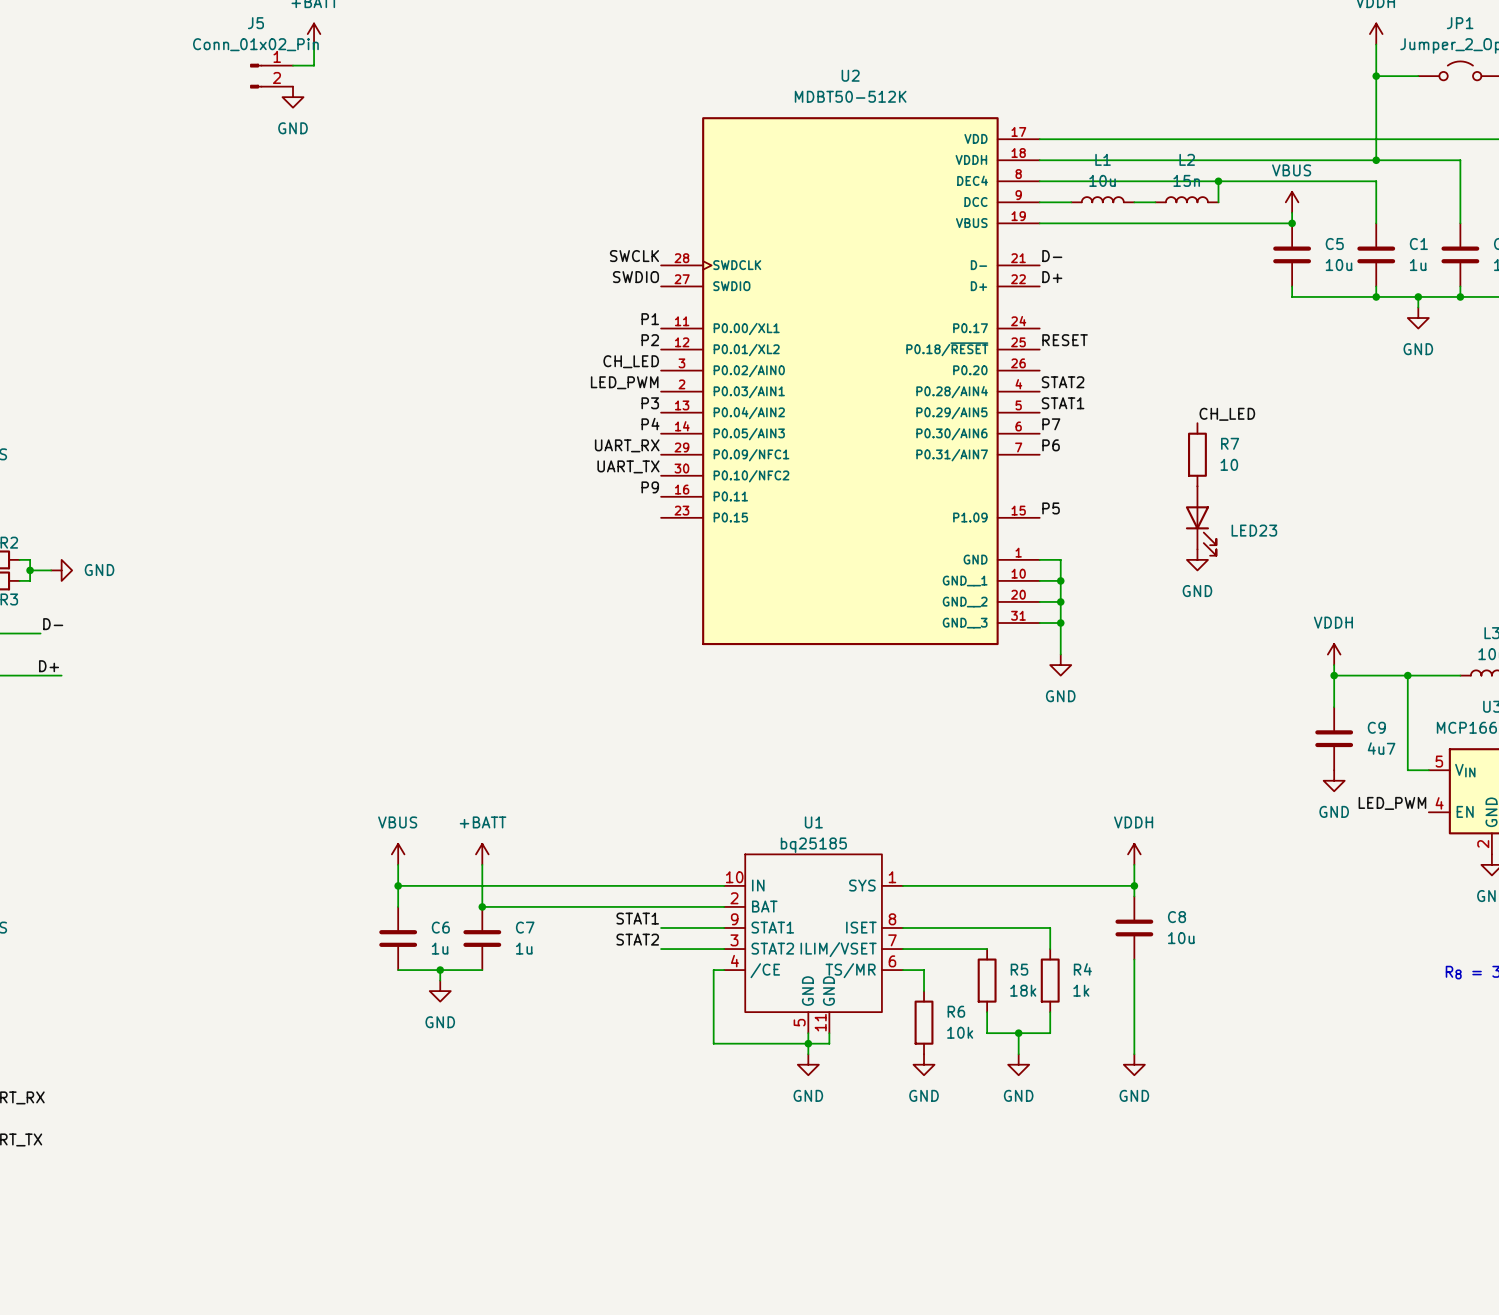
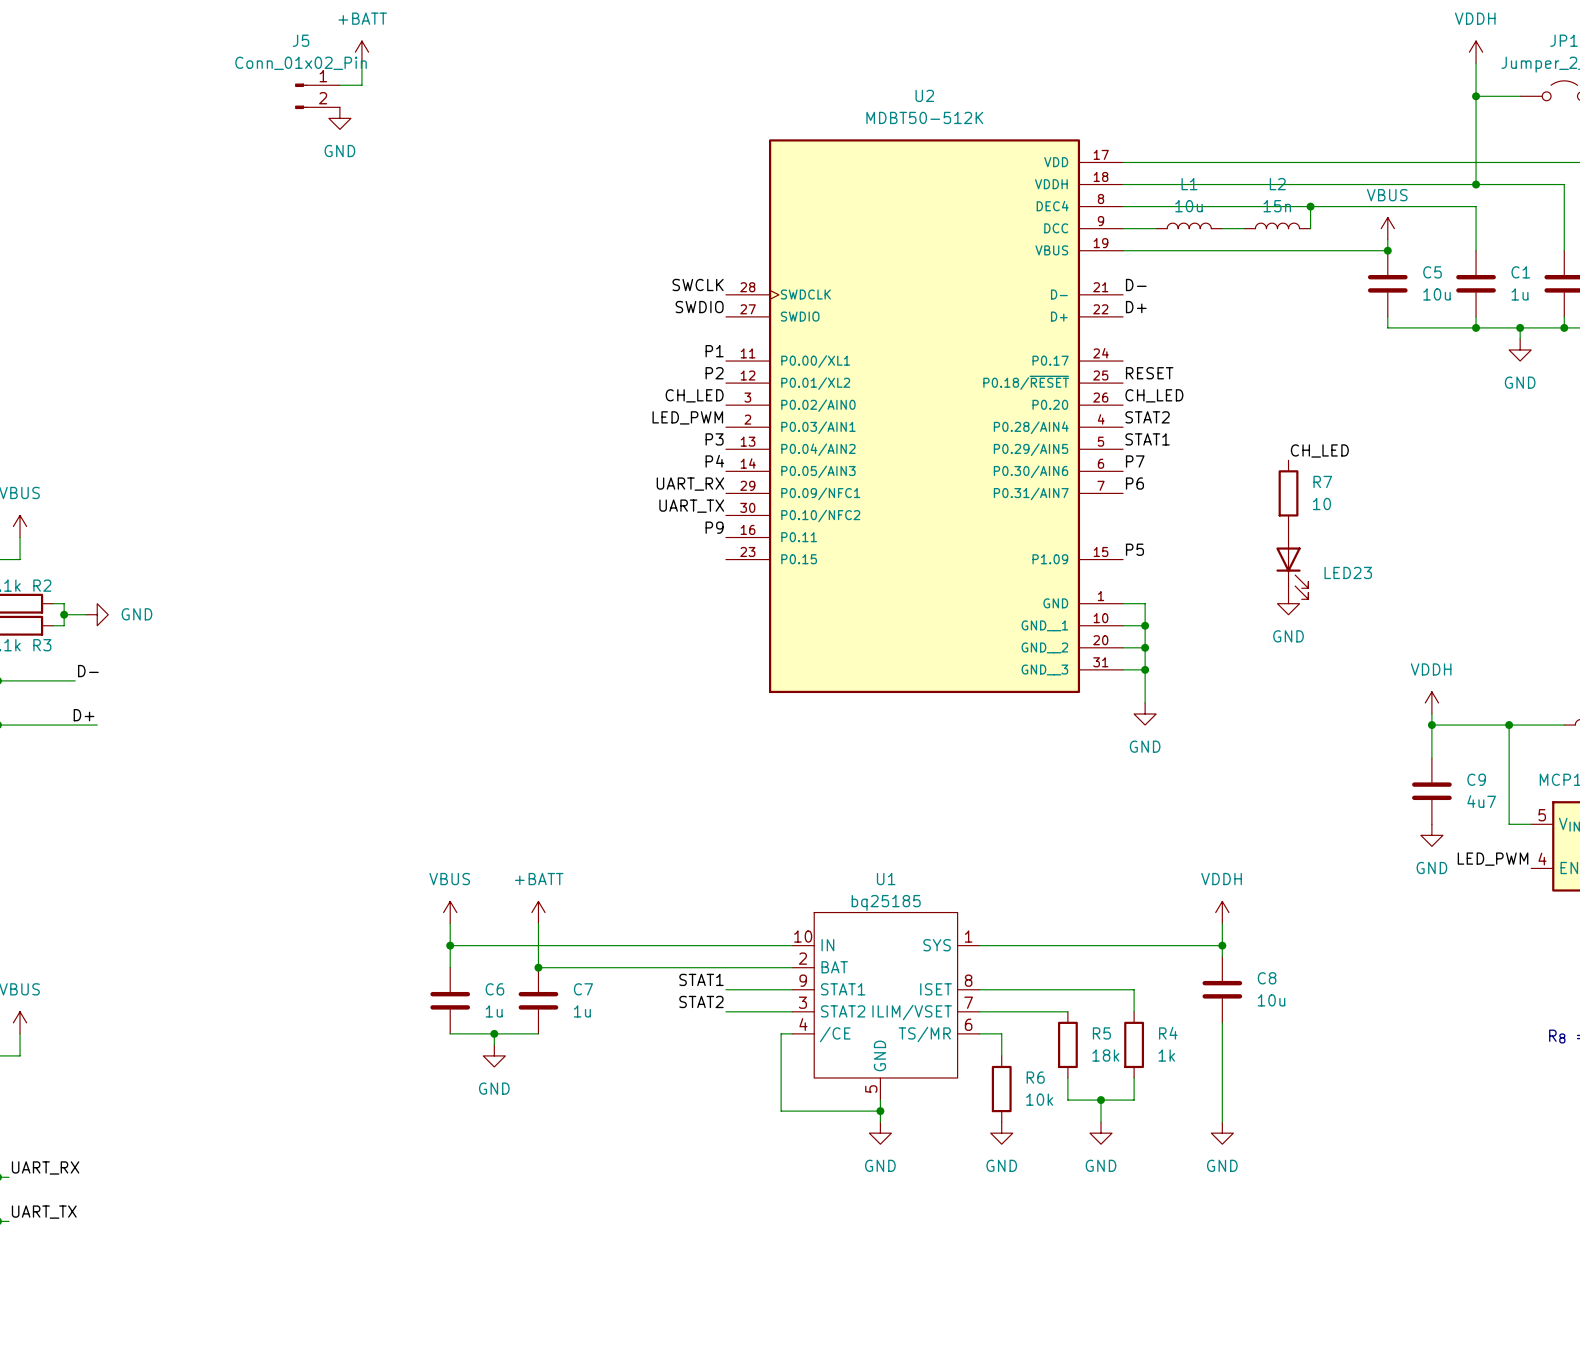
label: none -> CH_LED (1154, 395)
U1 symbol: [724, 854, 903, 1034] -> [792, 912, 980, 1101]
wire: (829, 1033) (829, 1043) (808, 1043) -> none

